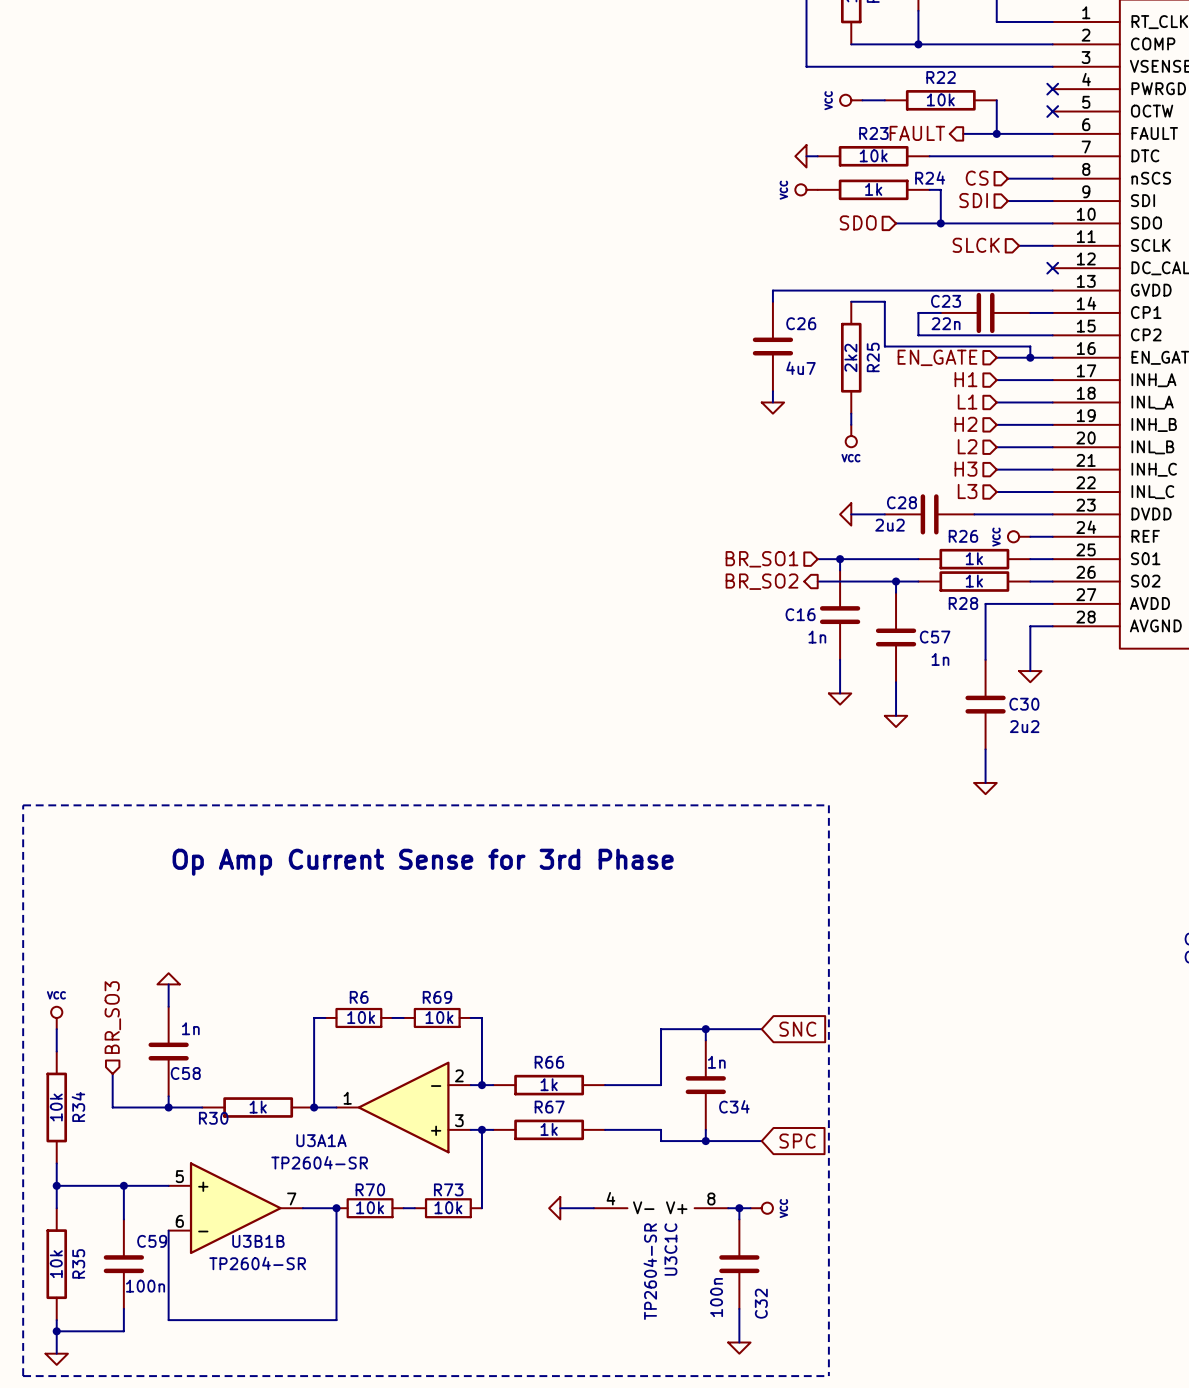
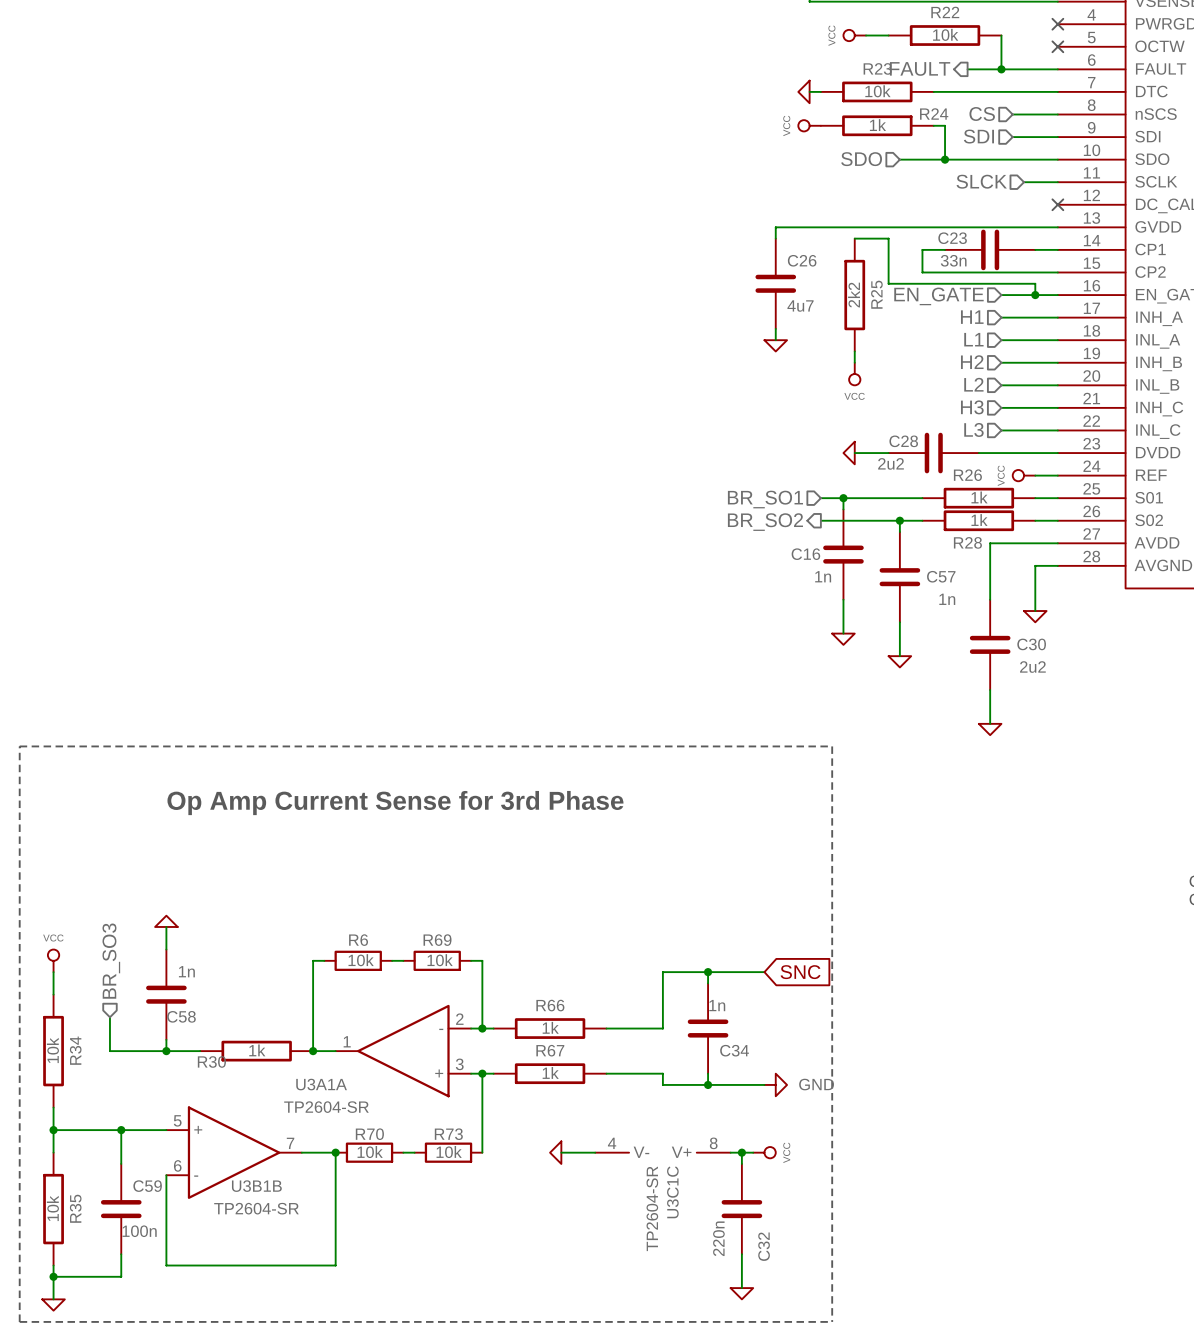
C23 value: 22n (946, 323) -> 33n (953, 260)
power symbol: none -> GND (775, 1084)
global label: SPC (797, 1141) -> none
C32 value: 100n (716, 1297) -> 220n (718, 1238)

